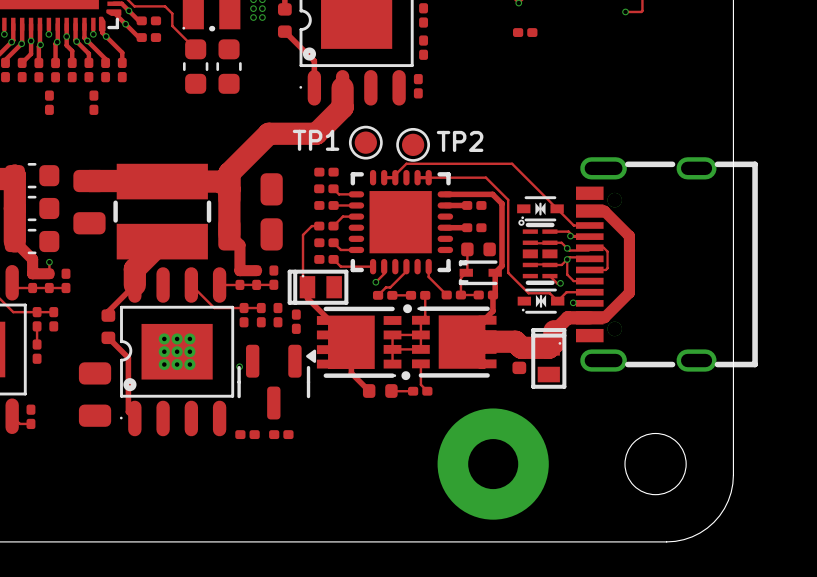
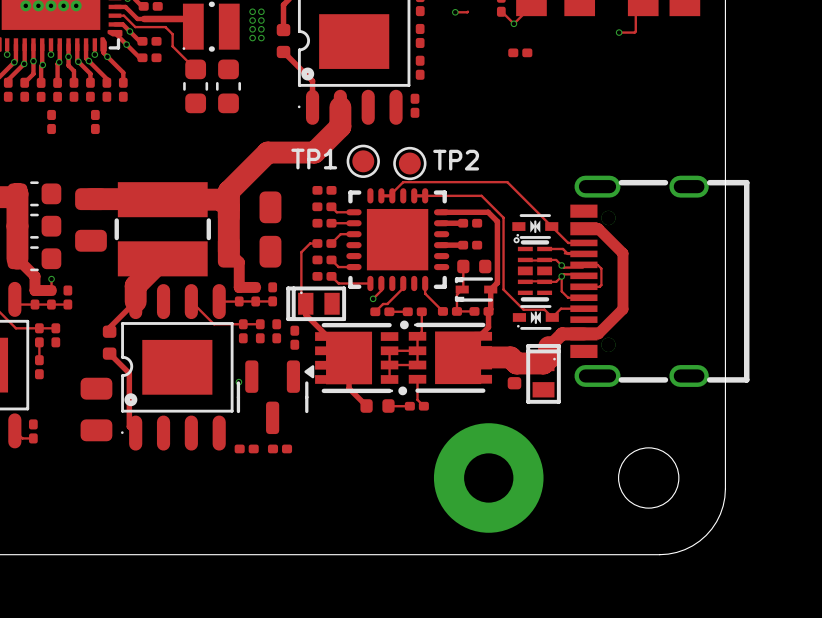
via: (570, 236) -> none
part footprint: [119, 267, 235, 437] -> [121, 284, 234, 451]
track: (549, 276) (557, 283) (560, 283) -> none
via: (560, 283) -> none
via: (573, 302) -> none

